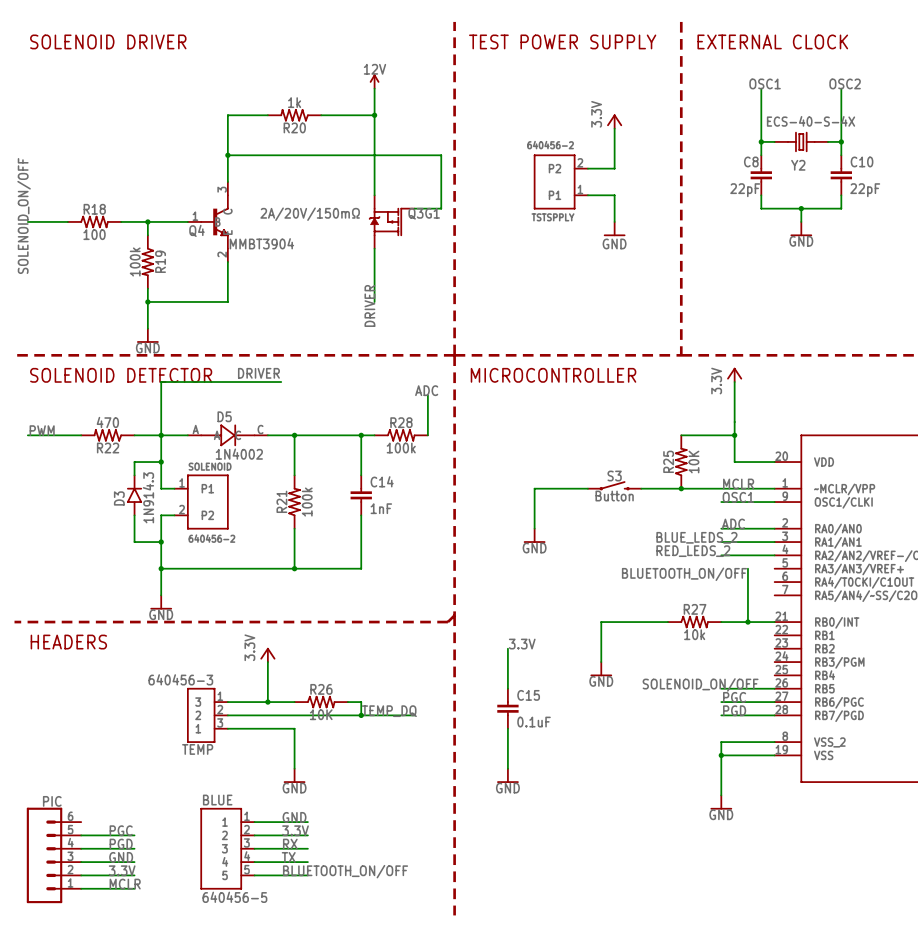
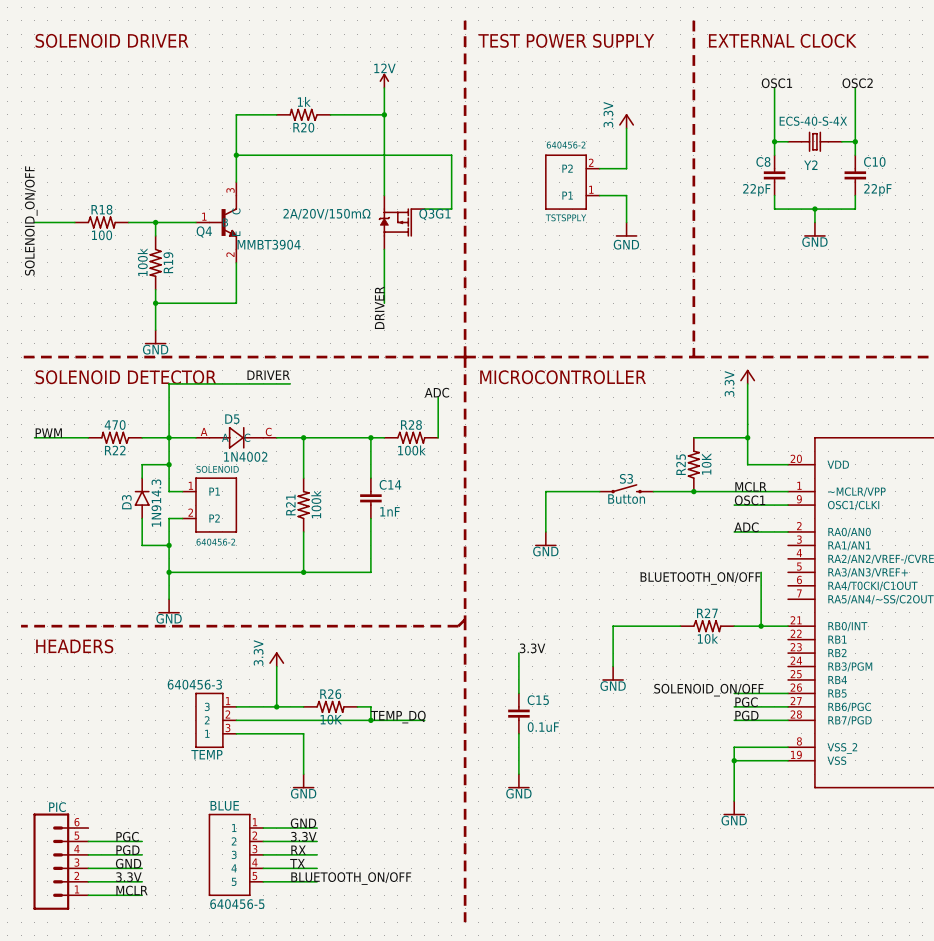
label: BLUE_LEDS_2 (696, 537) -> none
wire: (721, 542) (774, 542) -> none
label: RED_LEDS_2 (693, 551) -> none
wire: (721, 555) (774, 555) -> none

